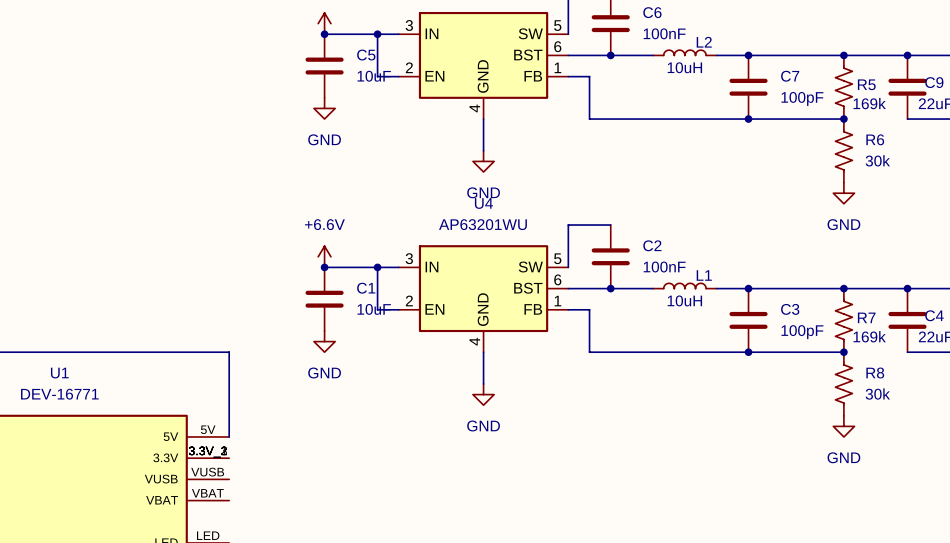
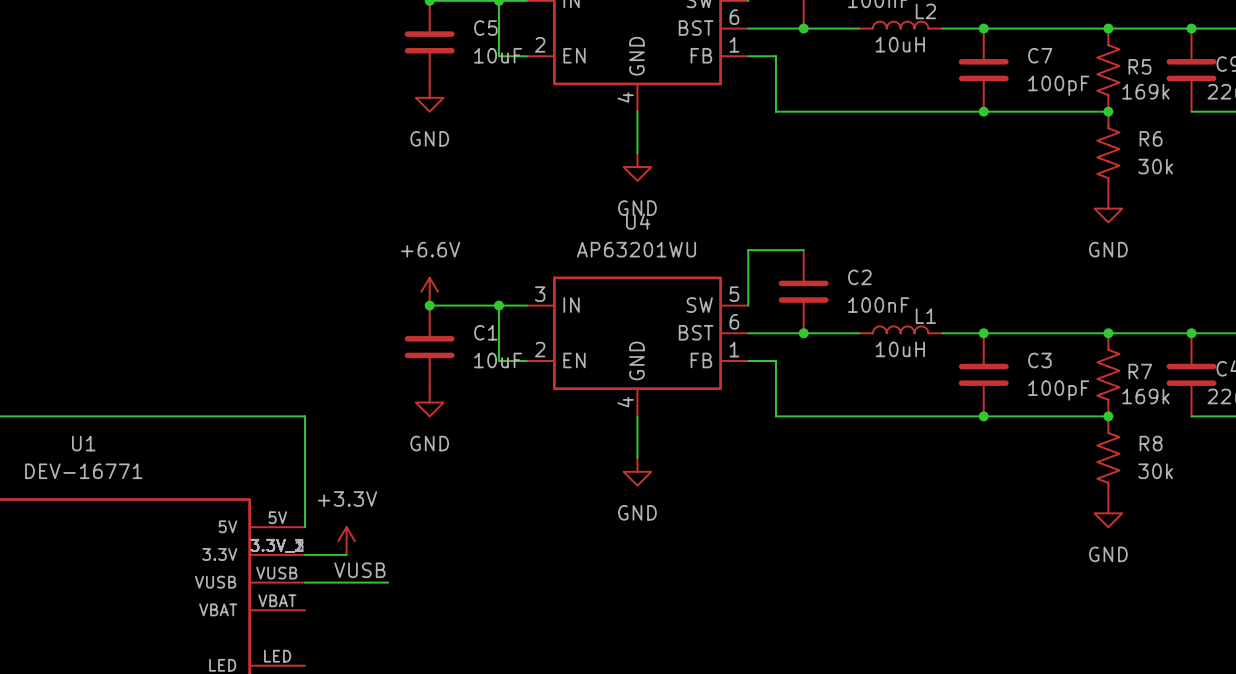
power symbol: none -> +3.3V (346, 541)
wire: none -> (305, 554) (346, 554)
label: none -> VUSB (359, 570)
wire: none -> (305, 582) (388, 582)

